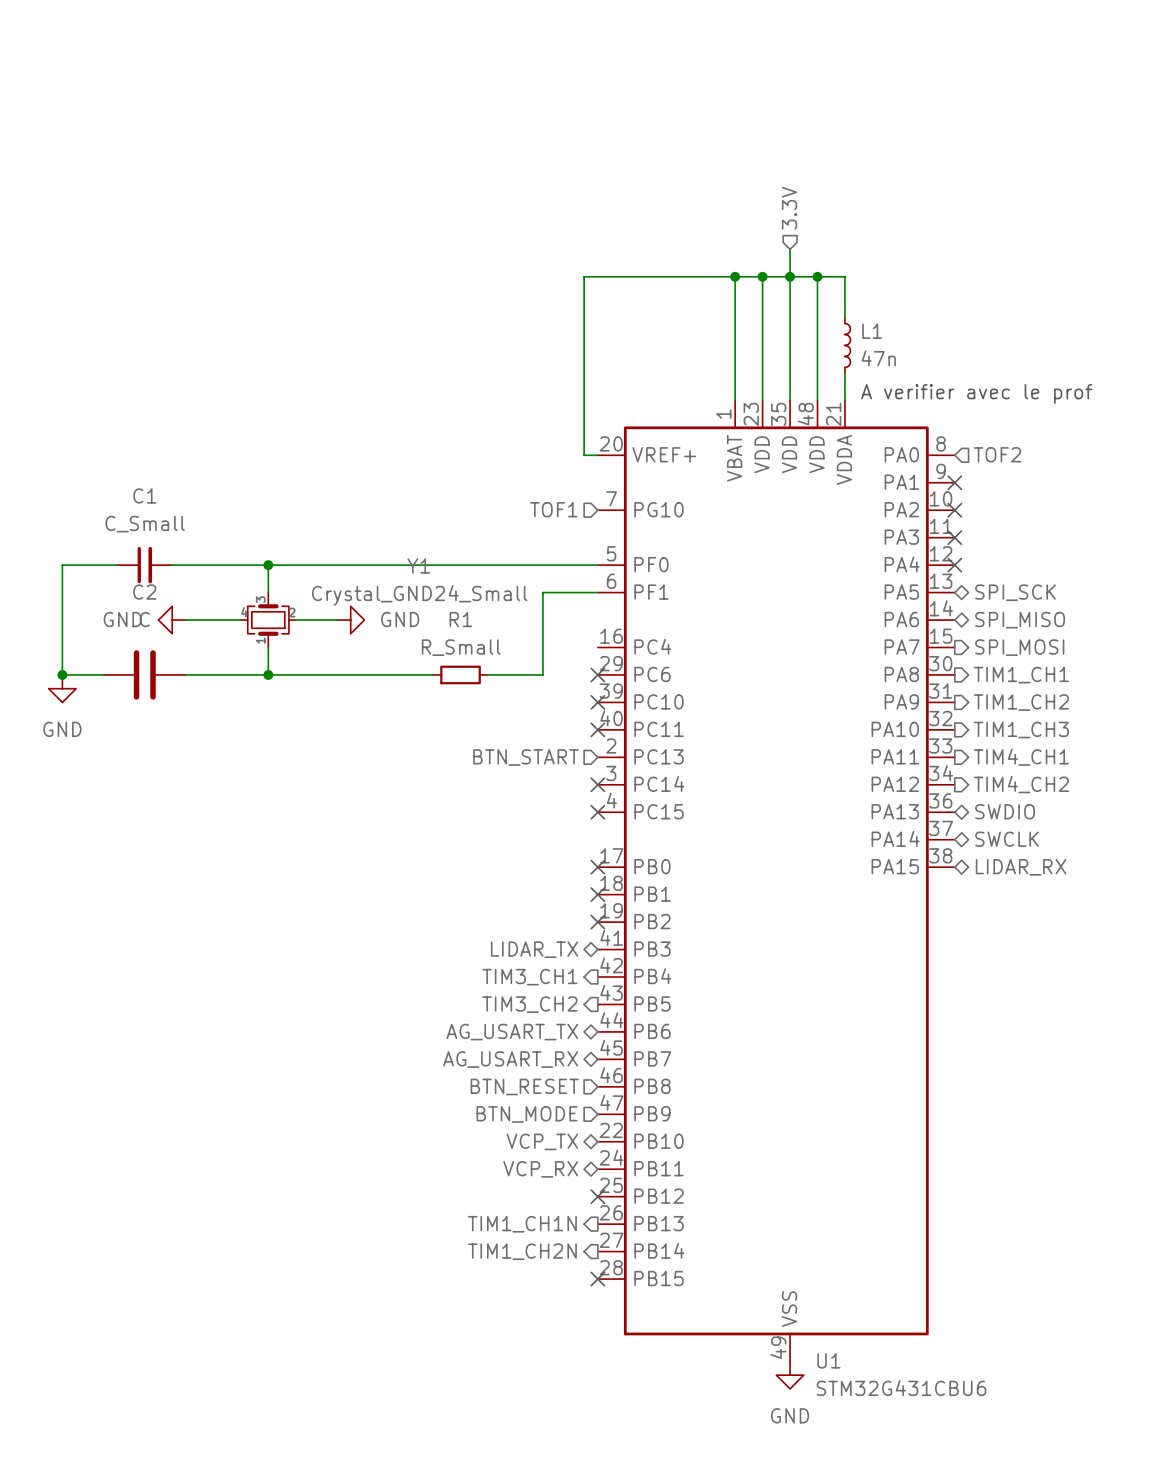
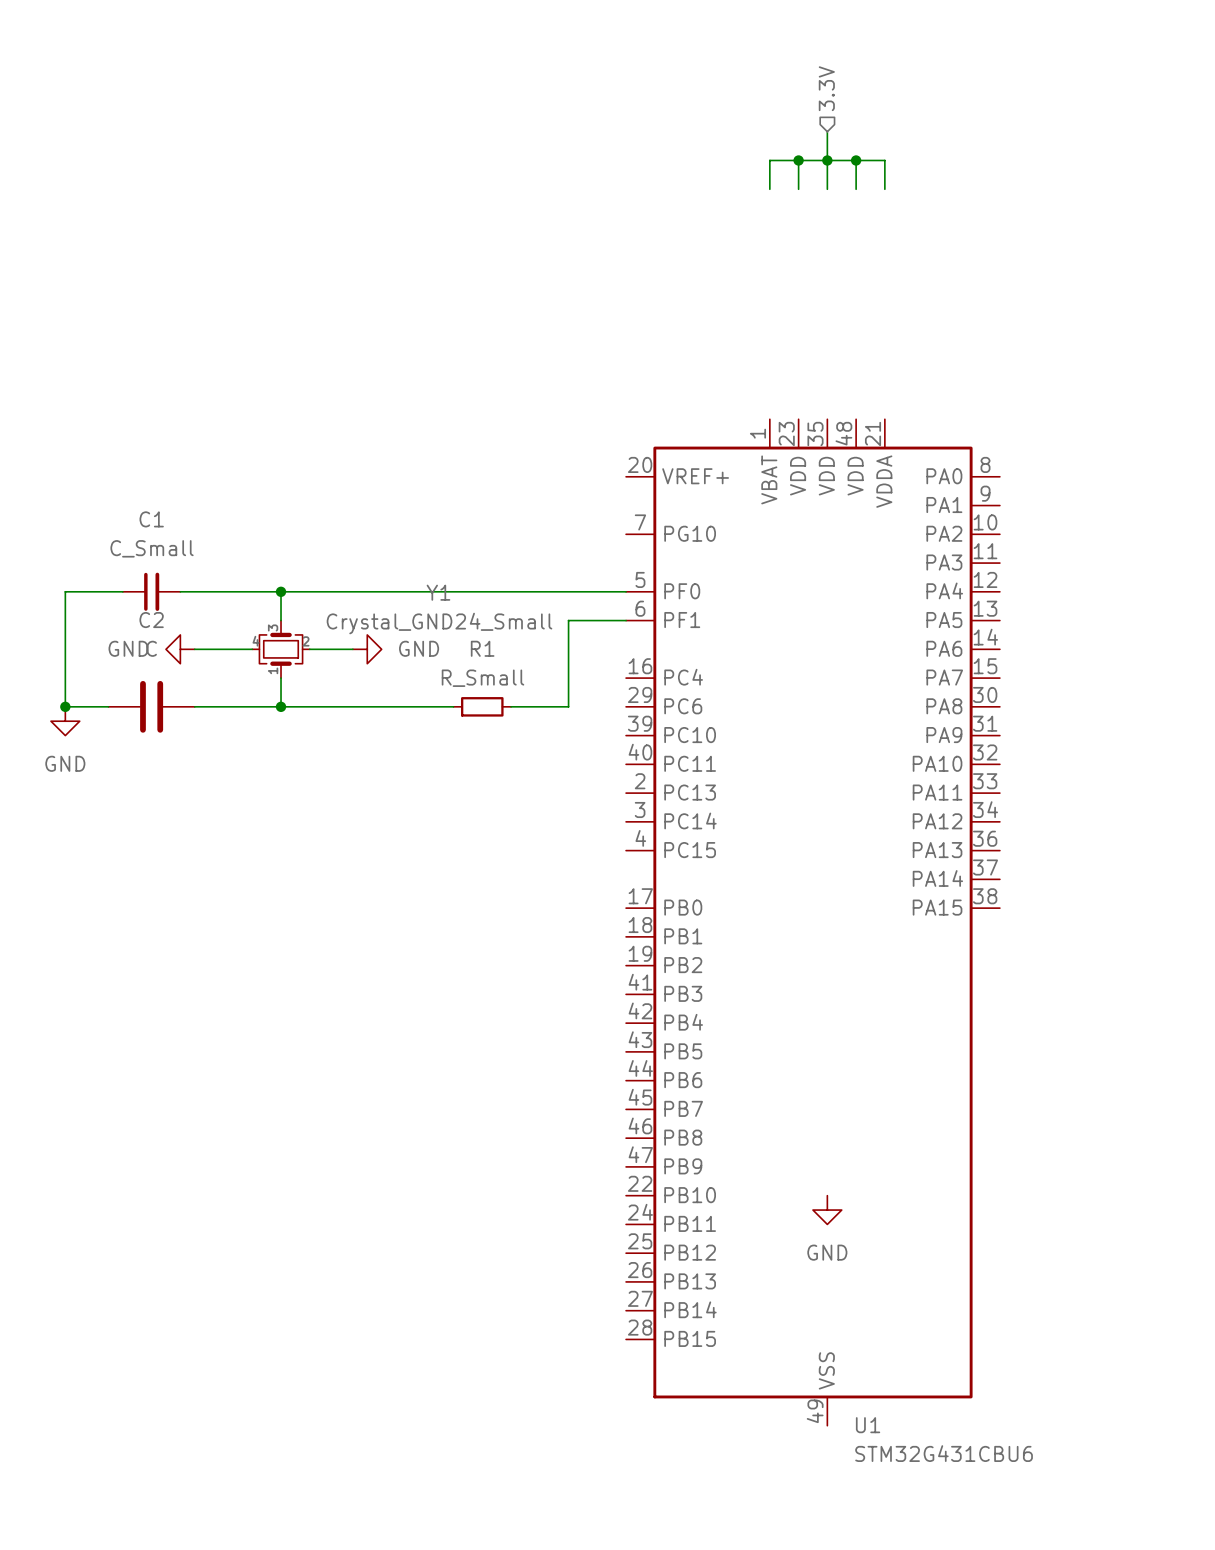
wire: none -> (827, 131) (827, 189)
wire: none -> (798, 160) (798, 189)
junction: none -> (798, 160)
junction: none -> (827, 160)
junction: none -> (856, 160)
wire: none -> (769, 189) (769, 160) (884, 160) (884, 189)
hierarchical label position: 3.3V (789, 208) -> 3.3V (826, 88)
wire: (790, 249) (790, 400) -> none
wire: (735, 276) (735, 400) -> none
junction: (735, 276) -> none
wire: (762, 276) (762, 400) -> none
junction: (762, 276) -> none
junction: (790, 276) -> none
wire: (817, 276) (817, 400) -> none
junction: (817, 276) -> none
wire: (844, 318) (844, 276) (584, 276) (584, 455) (597, 455) -> none
L1: 47n (847, 345) -> none
wire: (844, 372) (844, 400) -> (856, 160) (856, 189)
text: A verifier avec le prof (976, 393) -> none
hierarchical label: TOF2 (997, 454) -> none
no-connect mark: (954, 482) -> none
hierarchical label: TOF1 (553, 509) -> none
no-connect mark: (954, 510) -> none
no-connect mark: (954, 537) -> none
no-connect mark: (954, 565) -> none
hierarchical label: SPI_SCK (1015, 592) -> none
hierarchical label: SPI_MISO (1020, 620) -> none
hierarchical label: SPI_MOSI (1019, 647) -> none
no-connect mark: (597, 674) -> none
hierarchical label: TIM1_CH1 (1021, 675) -> none
no-connect mark: (597, 702) -> none
hierarchical label: TIM1_CH2 (1021, 702) -> none
no-connect mark: (597, 729) -> none
hierarchical label: TIM1_CH3 (1021, 730) -> none
hierarchical label: BTN_START (526, 757) -> none
hierarchical label: TIM4_CH1 (1021, 757) -> none
no-connect mark: (597, 784) -> none
hierarchical label: TIM4_CH2 (1021, 784) -> none
hierarchical label: SWDIO (1005, 811) -> none
no-connect mark: (597, 812) -> none
hierarchical label: SWCLK (1006, 839) -> none
no-connect mark: (597, 867) -> none
hierarchical label: LIDAR_RX (1021, 867) -> none
no-connect mark: (597, 894) -> none
no-connect mark: (597, 922) -> none
hierarchical label: LIDAR_TX (534, 949) -> none
hierarchical label: TIM3_CH1 (529, 977) -> none
hierarchical label: TIM3_CH2 (529, 1004) -> none
hierarchical label: AG_USART_TX (512, 1032) -> none
hierarchical label: AG_USART_RX (510, 1059) -> none
hierarchical label: BTN_RESET (524, 1086) -> none
hierarchical label: BTN_MODE (527, 1114) -> none
hierarchical label: VCP_TX (542, 1141) -> none
hierarchical label: VCP_RX (540, 1169) -> none
no-connect mark: (597, 1196) -> none
hierarchical label: TIM1_CH1N (522, 1224) -> none
hierarchical label: TIM1_CH2N (522, 1251) -> none
no-connect mark: (597, 1279) -> none
power symbol position: GND (790, 1375) -> GND (827, 1210)

